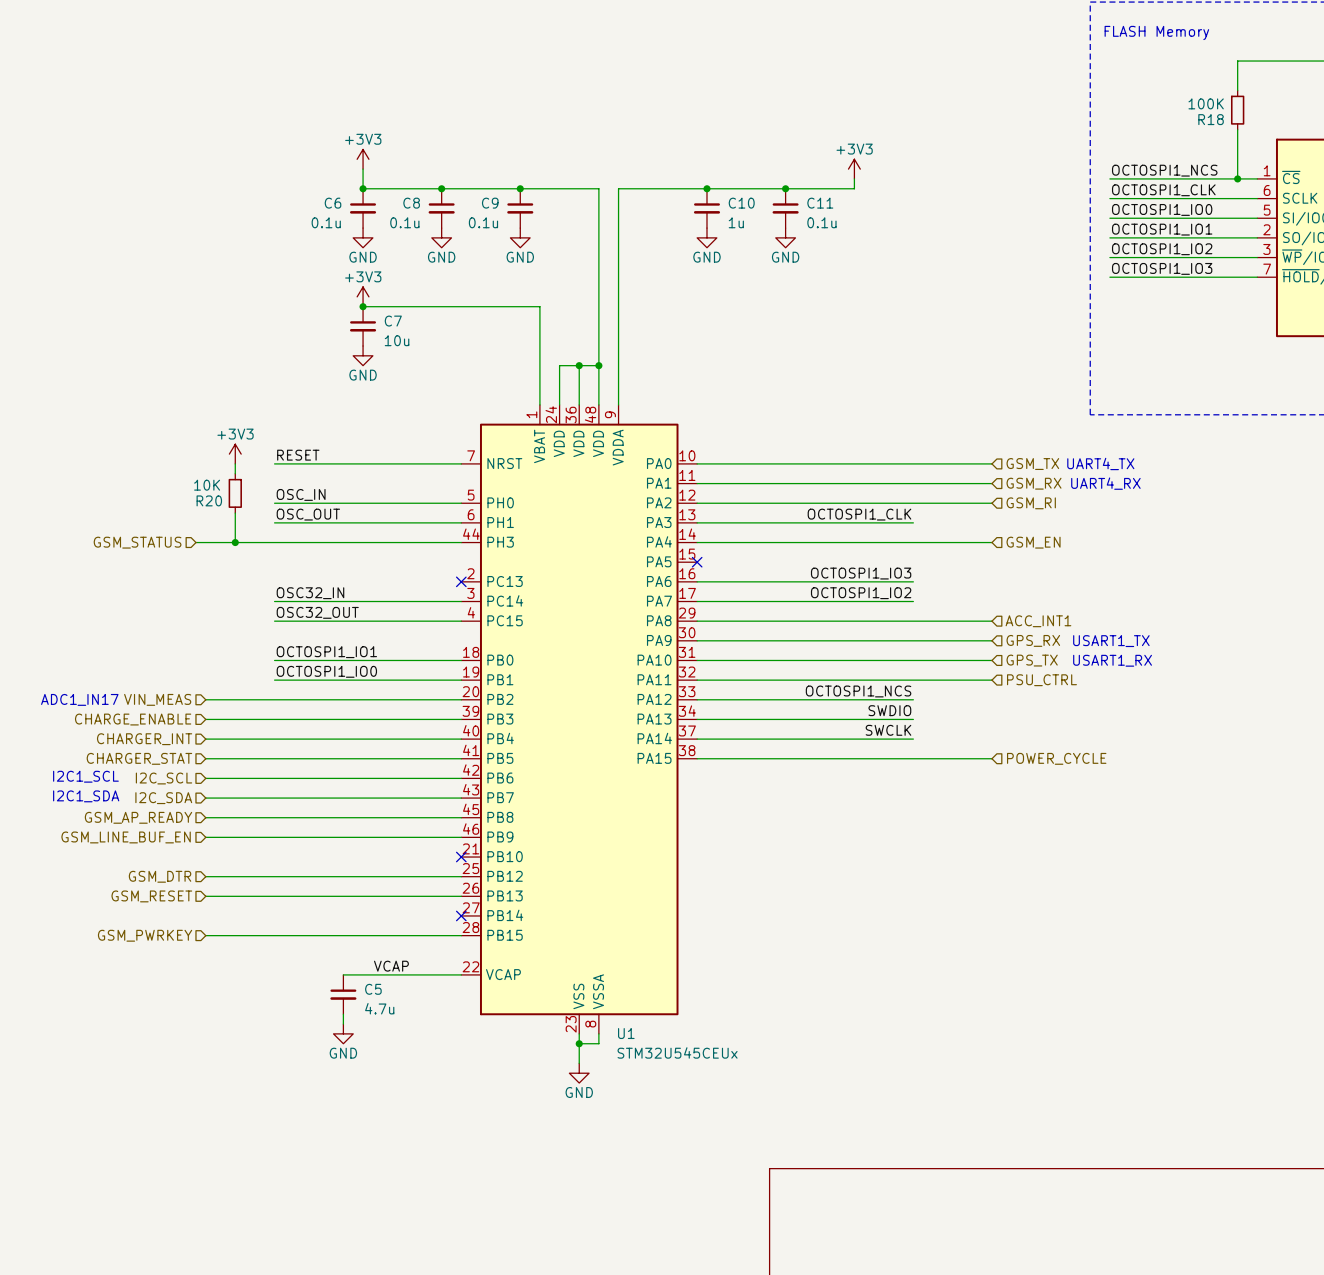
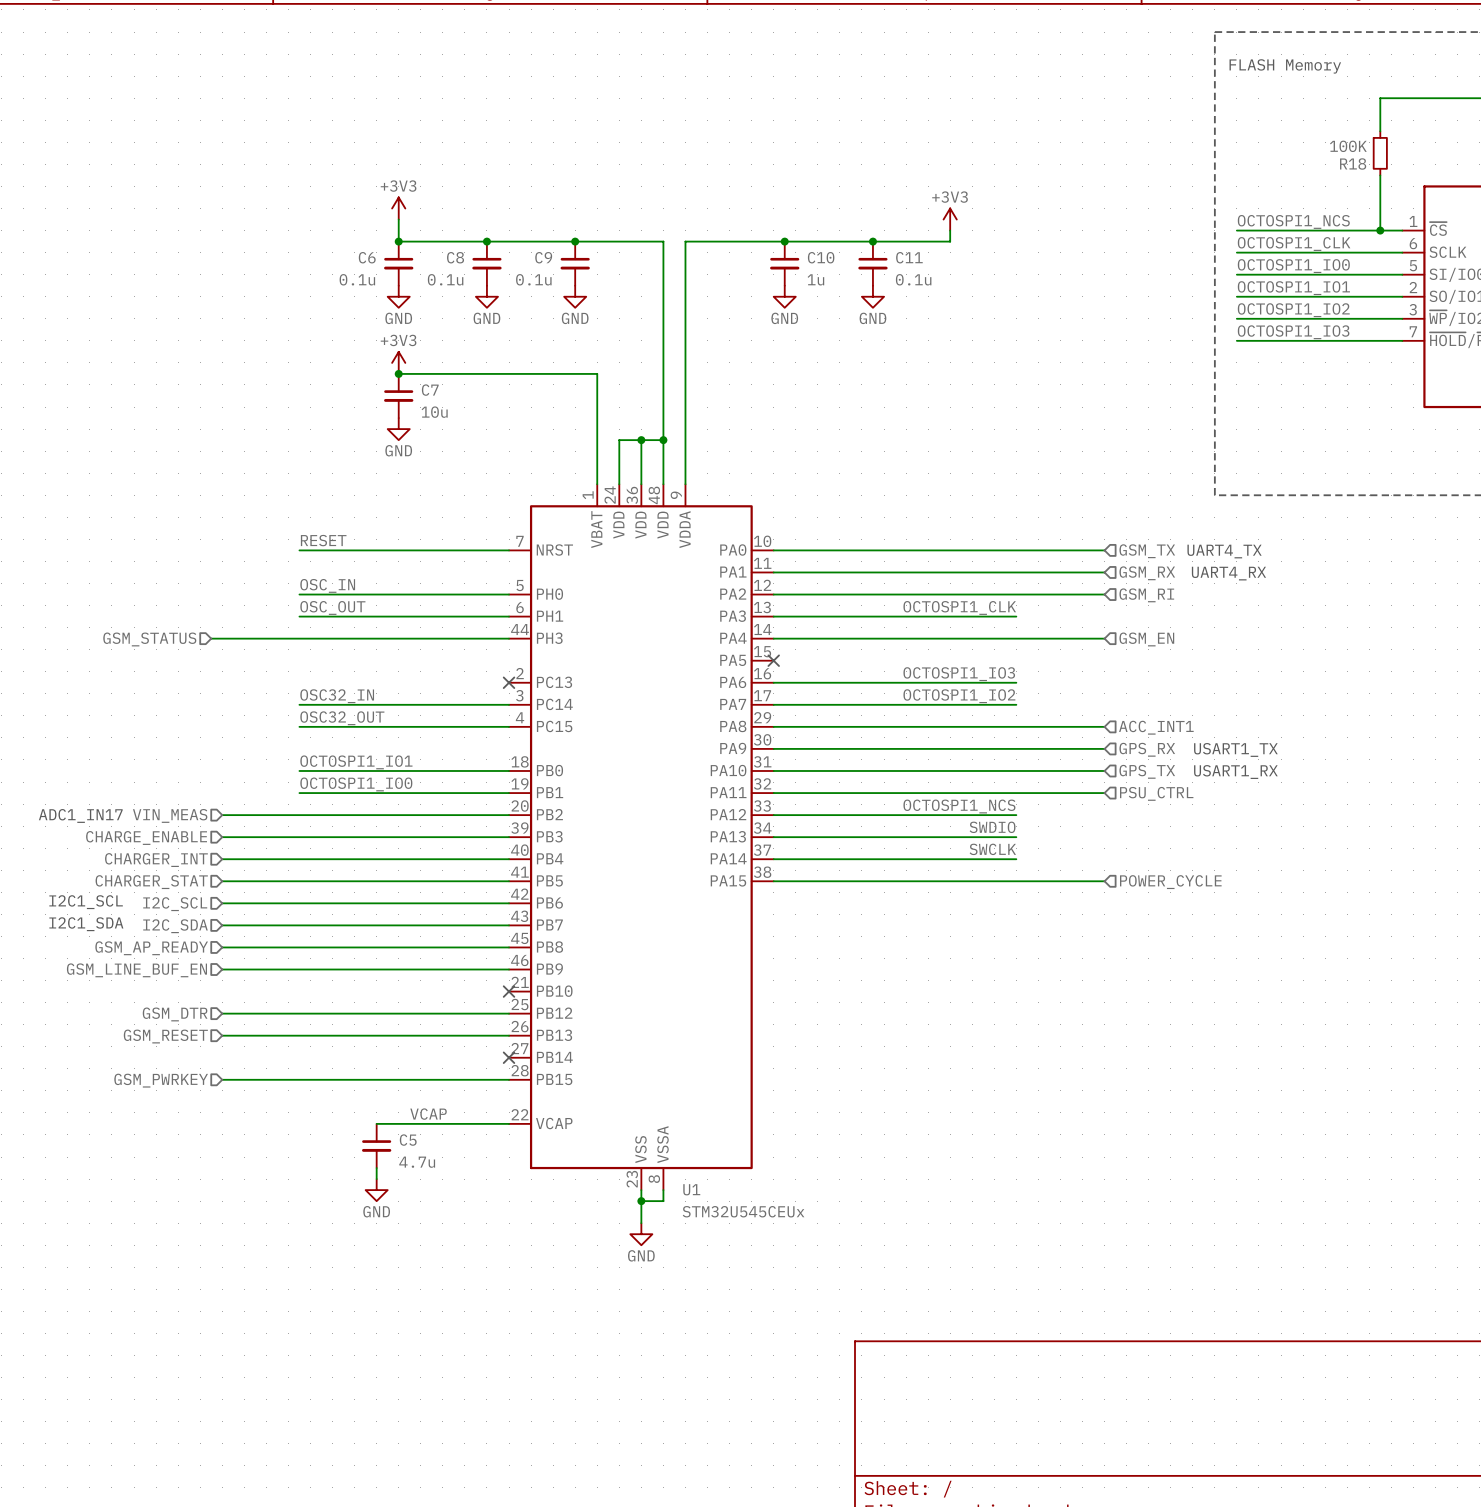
power symbol: +3V3 (235, 454) -> none
wire: (235, 463) (235, 473) -> none
R20: 10K (235, 493) -> none
wire: (235, 513) (235, 542) -> none
junction: (235, 542) -> none

